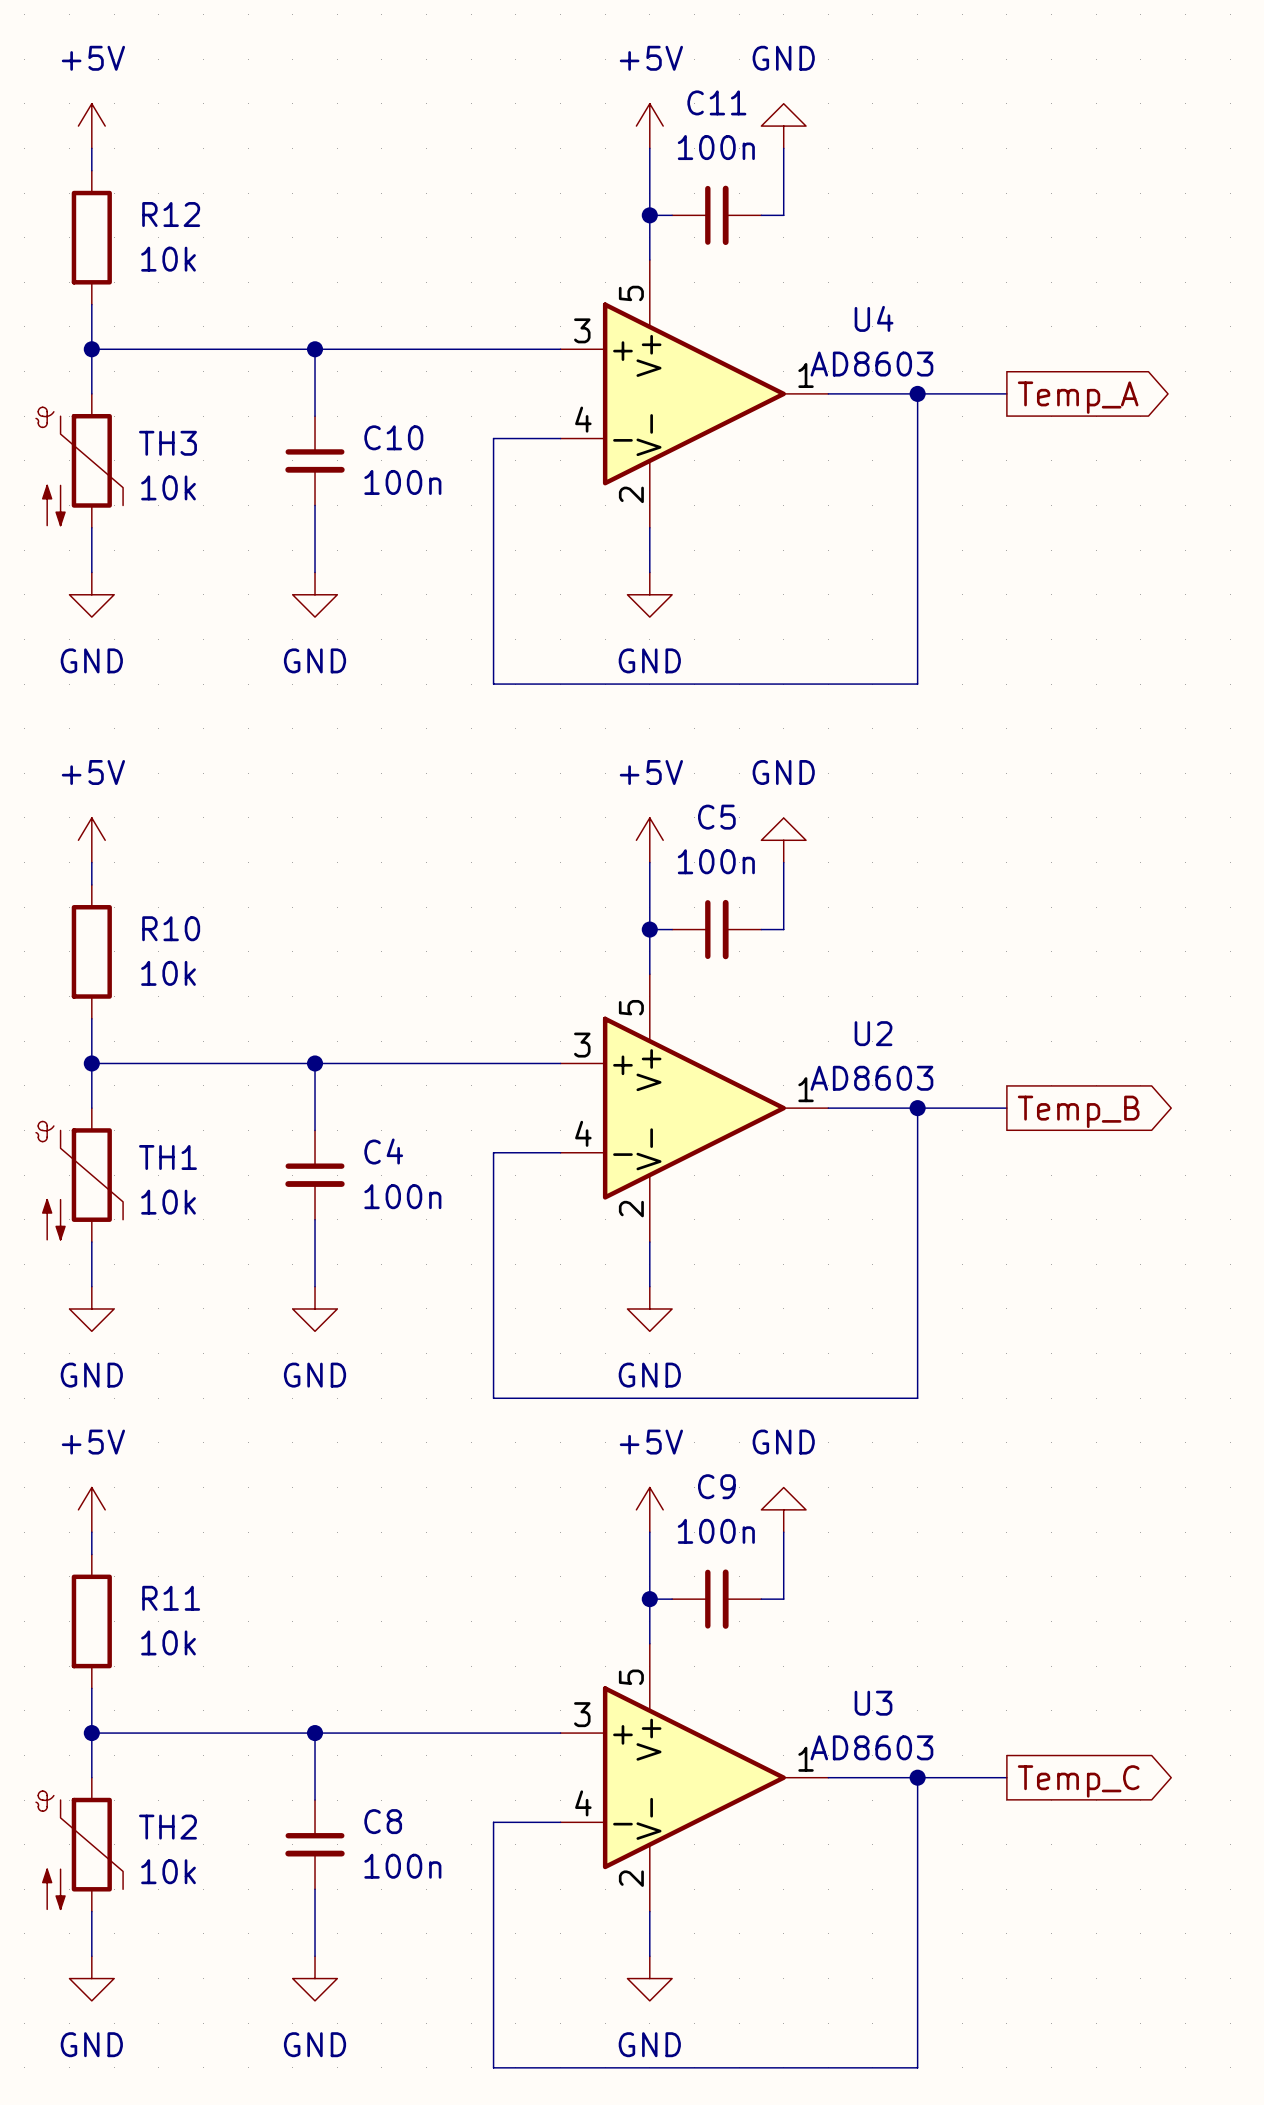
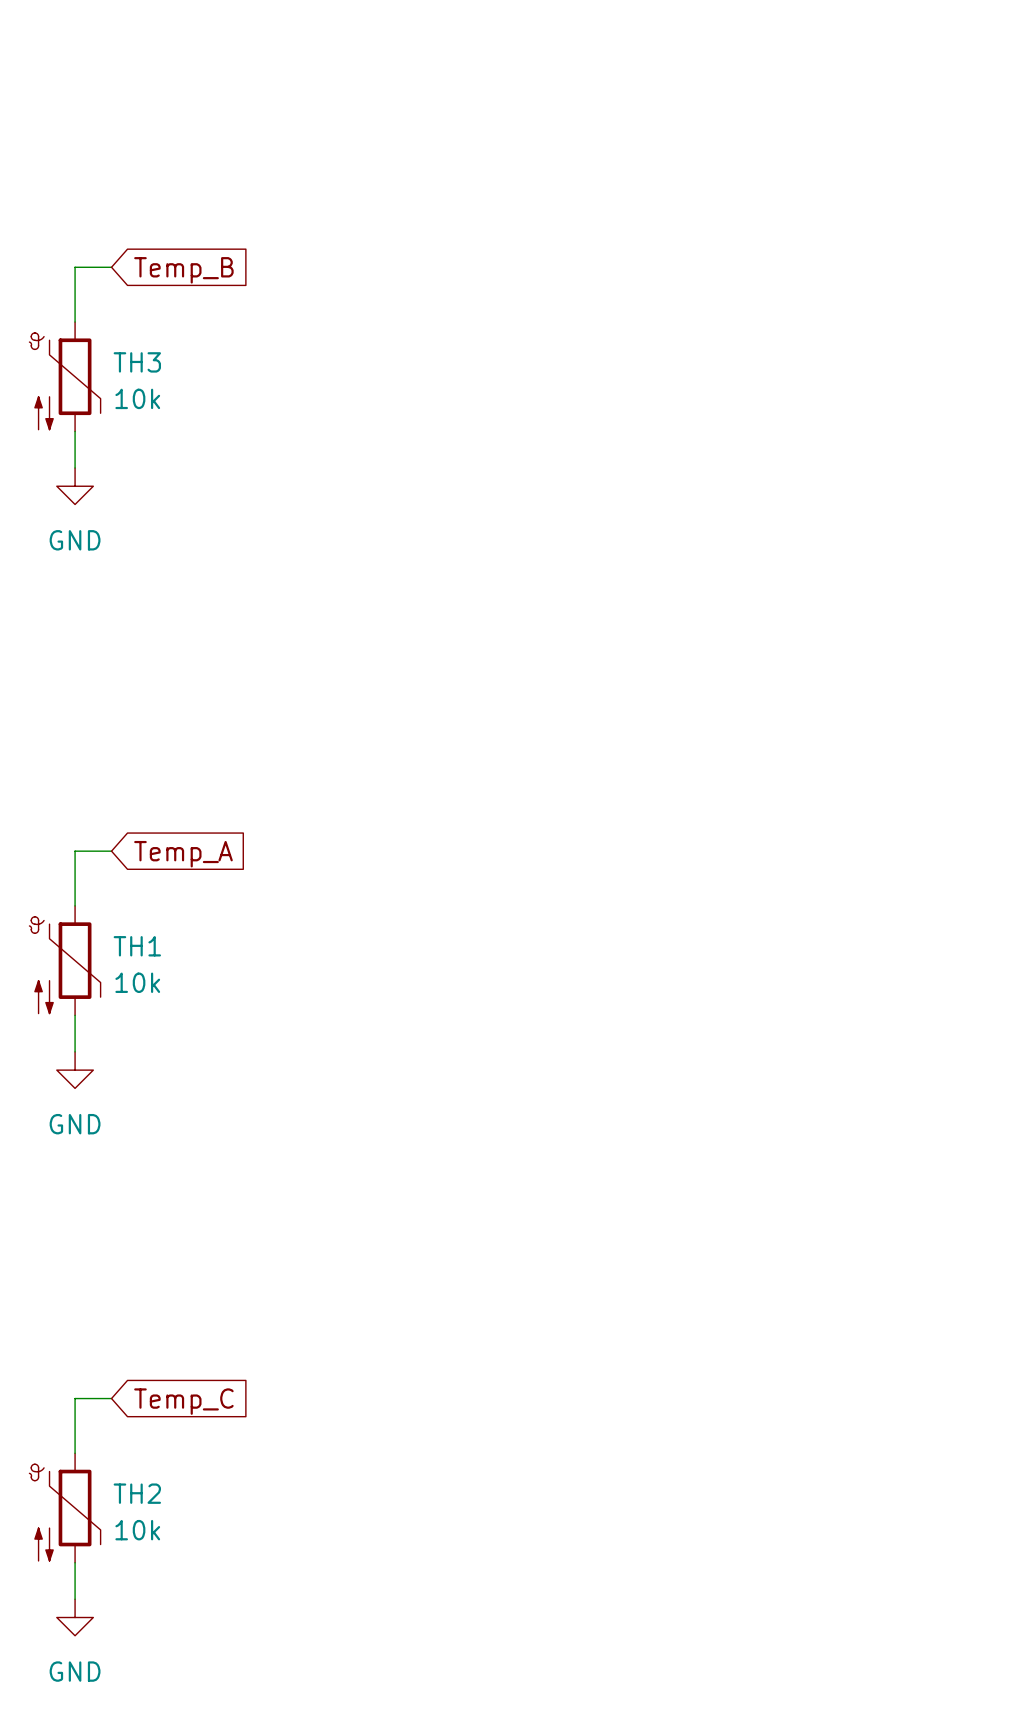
power symbol: +5V (91, 126) -> none
power symbol: +5V (649, 126) -> none
power symbol: GND (783, 126) -> none
wire: (91, 148) (91, 170) -> none
wire: (649, 148) (649, 259) -> none
wire: (783, 148) (783, 215) (761, 215) -> none
wire: (649, 215) (672, 215) -> none
junction: (649, 215) -> none
C11: 100n (716, 215) -> none
R12: 10k (91, 237) -> none
wire: (91, 304) (91, 326) -> (111, 267) (75, 267)
global label: none -> Temp_B (183, 270)
wire: (91, 349) (560, 349) -> none
junction: (91, 349) -> none
wire: (315, 349) (315, 416) -> none
junction: (315, 349) -> none
U4: AD8603 (694, 393) -> none
wire: (828, 393) (1006, 393) -> none
wire: (917, 393) (917, 684) (493, 684) (493, 438) (560, 438) -> none
junction: (917, 393) -> none
global label: Temp_A (1078, 397) -> none
C10: 100n (315, 460) -> none
wire: (315, 505) (315, 572) -> none
wire: (649, 527) (649, 572) -> none
power symbol: GND (315, 594) -> none
power symbol: GND (649, 594) -> none
power symbol: +5V (91, 840) -> none
power symbol: +5V (649, 840) -> none
power symbol: GND (783, 840) -> none
wire: (91, 862) (91, 884) -> none
wire: (649, 862) (649, 974) -> none
wire: (783, 862) (783, 929) (761, 929) -> none
wire: (649, 929) (672, 929) -> none
junction: (649, 929) -> none
C5: 100n (716, 929) -> none
R10: 10k (91, 951) -> none
wire: (91, 1018) (91, 1041) -> (111, 851) (75, 851)
global label: none -> Temp_A (183, 854)
wire: (91, 1063) (560, 1063) -> none
junction: (91, 1063) -> none
wire: (315, 1063) (315, 1130) -> none
junction: (315, 1063) -> none
U2: AD8603 (694, 1108) -> none
wire: (828, 1108) (1006, 1108) -> none
wire: (917, 1108) (917, 1398) (493, 1398) (493, 1152) (560, 1152) -> none
junction: (917, 1108) -> none
global label: Temp_B (1078, 1111) -> none
C4: 100n (315, 1175) -> none
wire: (315, 1219) (315, 1286) -> none
wire: (649, 1242) (649, 1286) -> none
power symbol: GND (315, 1308) -> none
power symbol: GND (649, 1308) -> none
power symbol: +5V (91, 1509) -> none
power symbol: +5V (649, 1509) -> none
power symbol: GND (783, 1509) -> none
wire: (91, 1532) (91, 1554) -> none
wire: (649, 1532) (649, 1643) -> none
wire: (783, 1532) (783, 1599) (761, 1599) -> none
wire: (649, 1599) (672, 1599) -> none
junction: (649, 1599) -> none
C9: 100n (716, 1599) -> none
R11: 10k (91, 1621) -> none
wire: (91, 1688) (91, 1710) -> (111, 1398) (75, 1398)
global label: none -> Temp_C (183, 1401)
wire: (91, 1733) (560, 1733) -> none
junction: (91, 1733) -> none
wire: (315, 1733) (315, 1800) -> none
junction: (315, 1733) -> none
U3: AD8603 (694, 1777) -> none
wire: (828, 1777) (1006, 1777) -> none
wire: (917, 1777) (917, 2067) (493, 2067) (493, 1822) (560, 1822) -> none
junction: (917, 1777) -> none
global label: Temp_C (1078, 1781) -> none
C8: 100n (315, 1844) -> none
wire: (315, 1889) (315, 1956) -> none
wire: (649, 1911) (649, 1956) -> none
power symbol: GND (315, 1978) -> none
power symbol: GND (649, 1978) -> none

